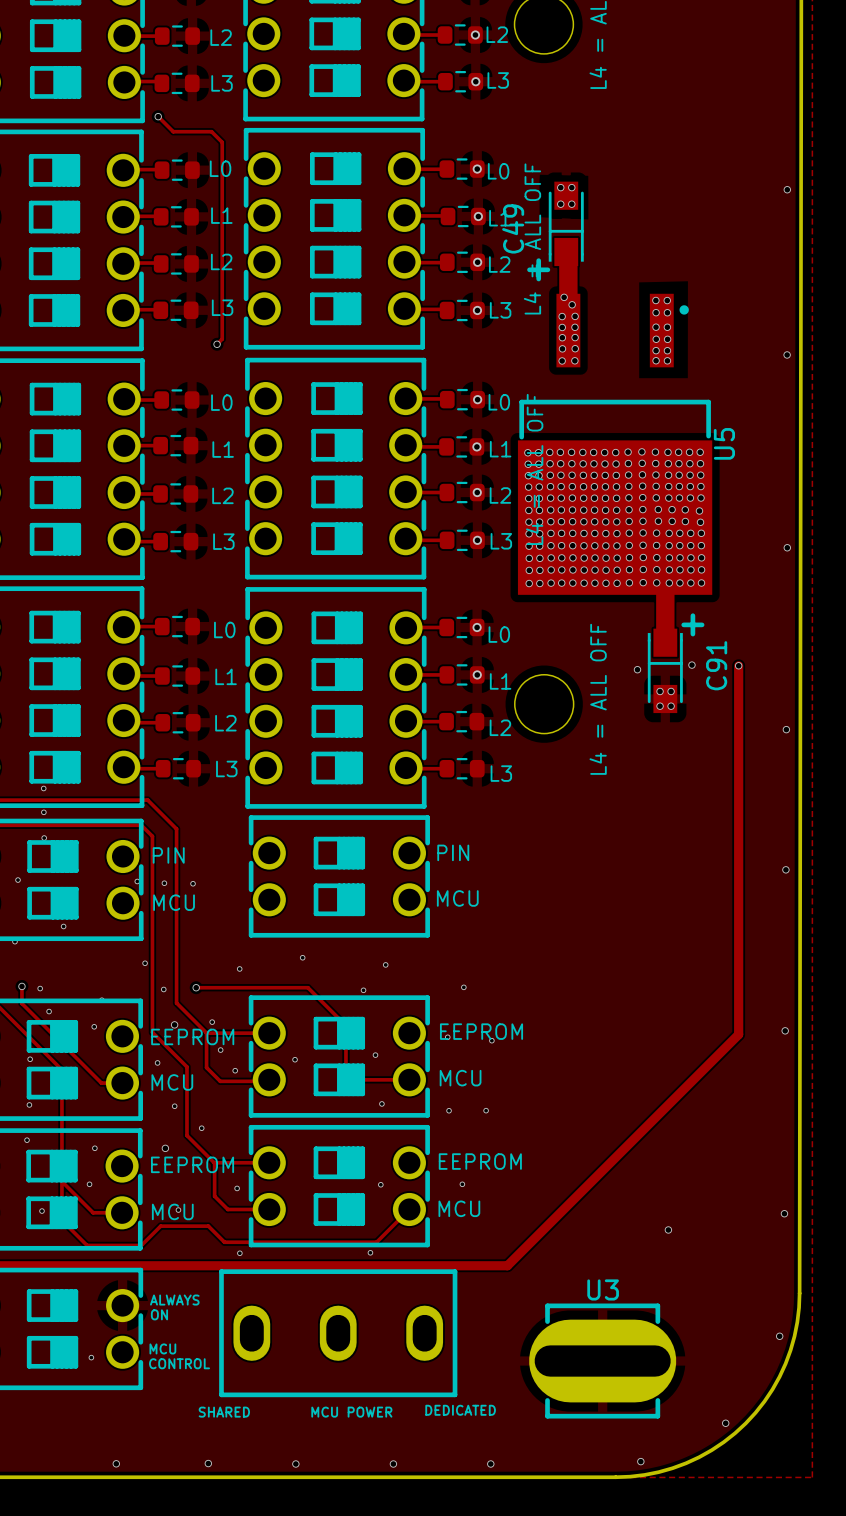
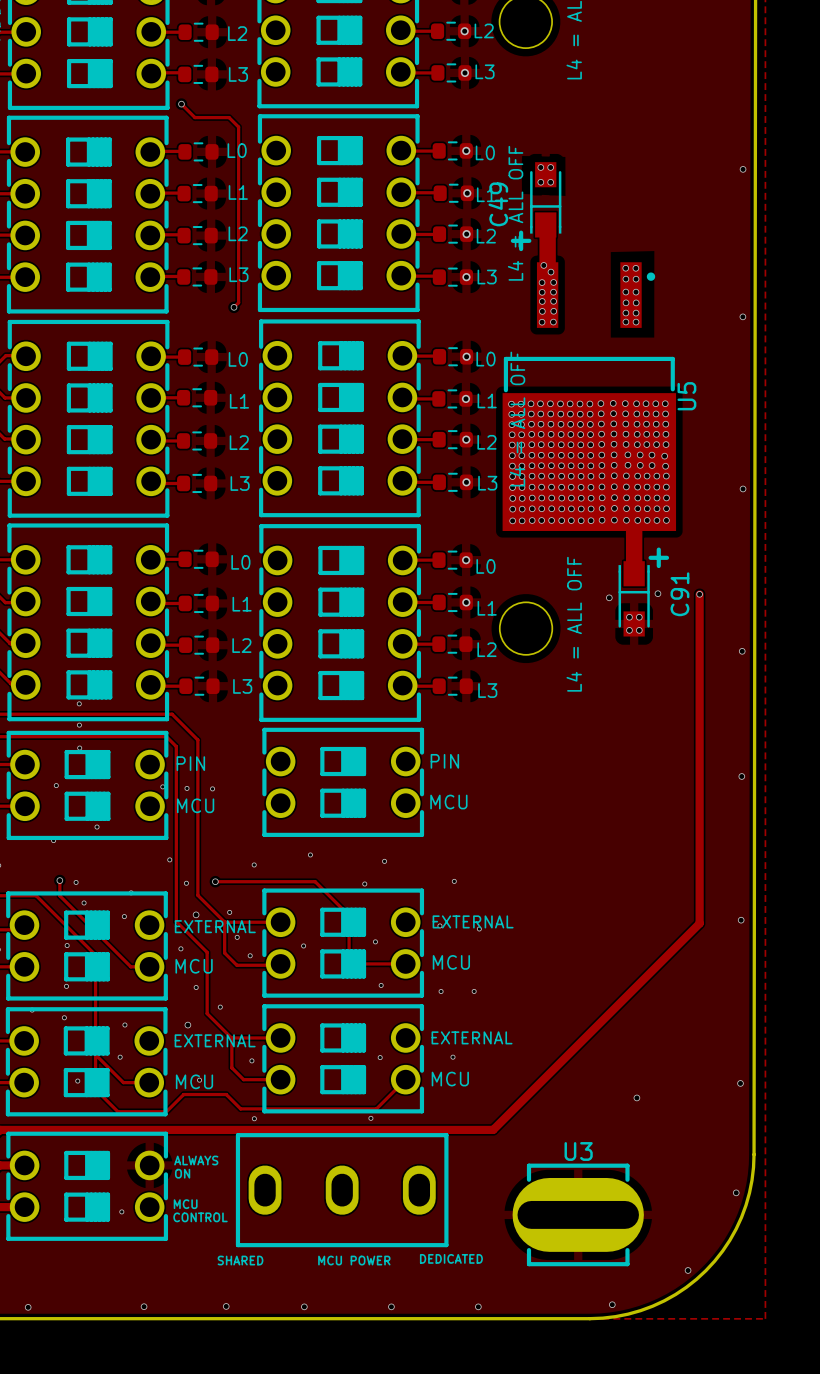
text: EEPROM (481, 1031) -> EXTERNAL (473, 921)
text: EEPROM (192, 1036) -> EXTERNAL (215, 926)
text: EEPROM (480, 1161) -> EXTERNAL (472, 1037)
text: EEPROM (192, 1164) -> EXTERNAL (215, 1040)

